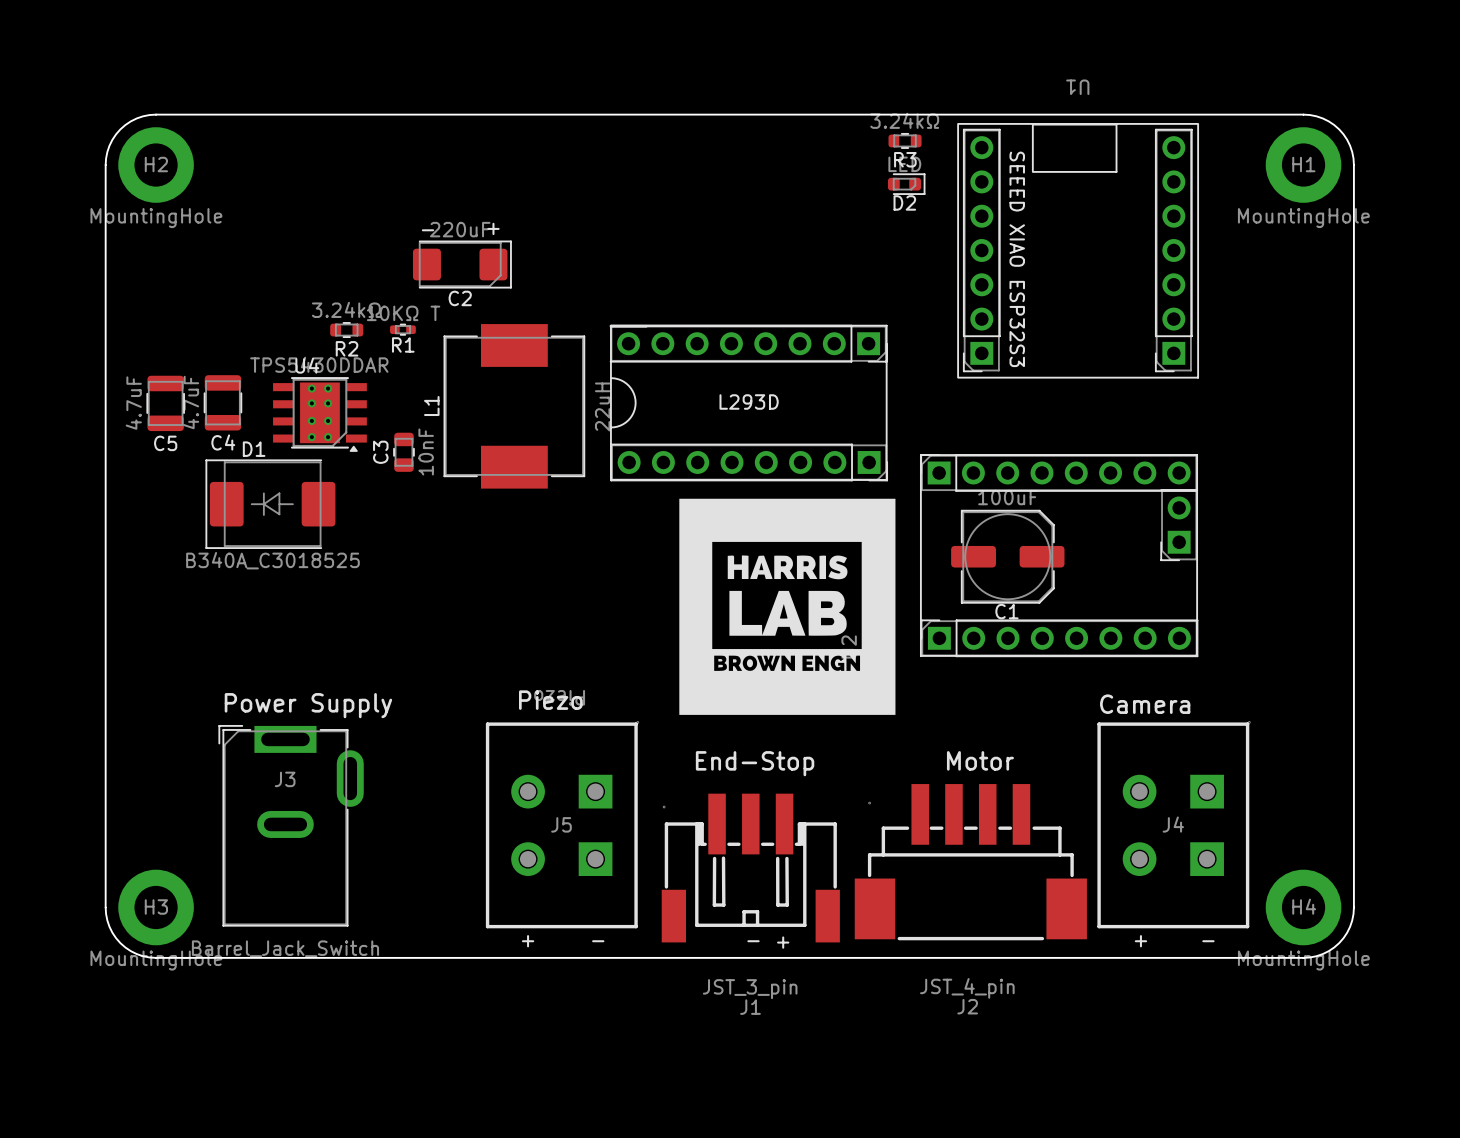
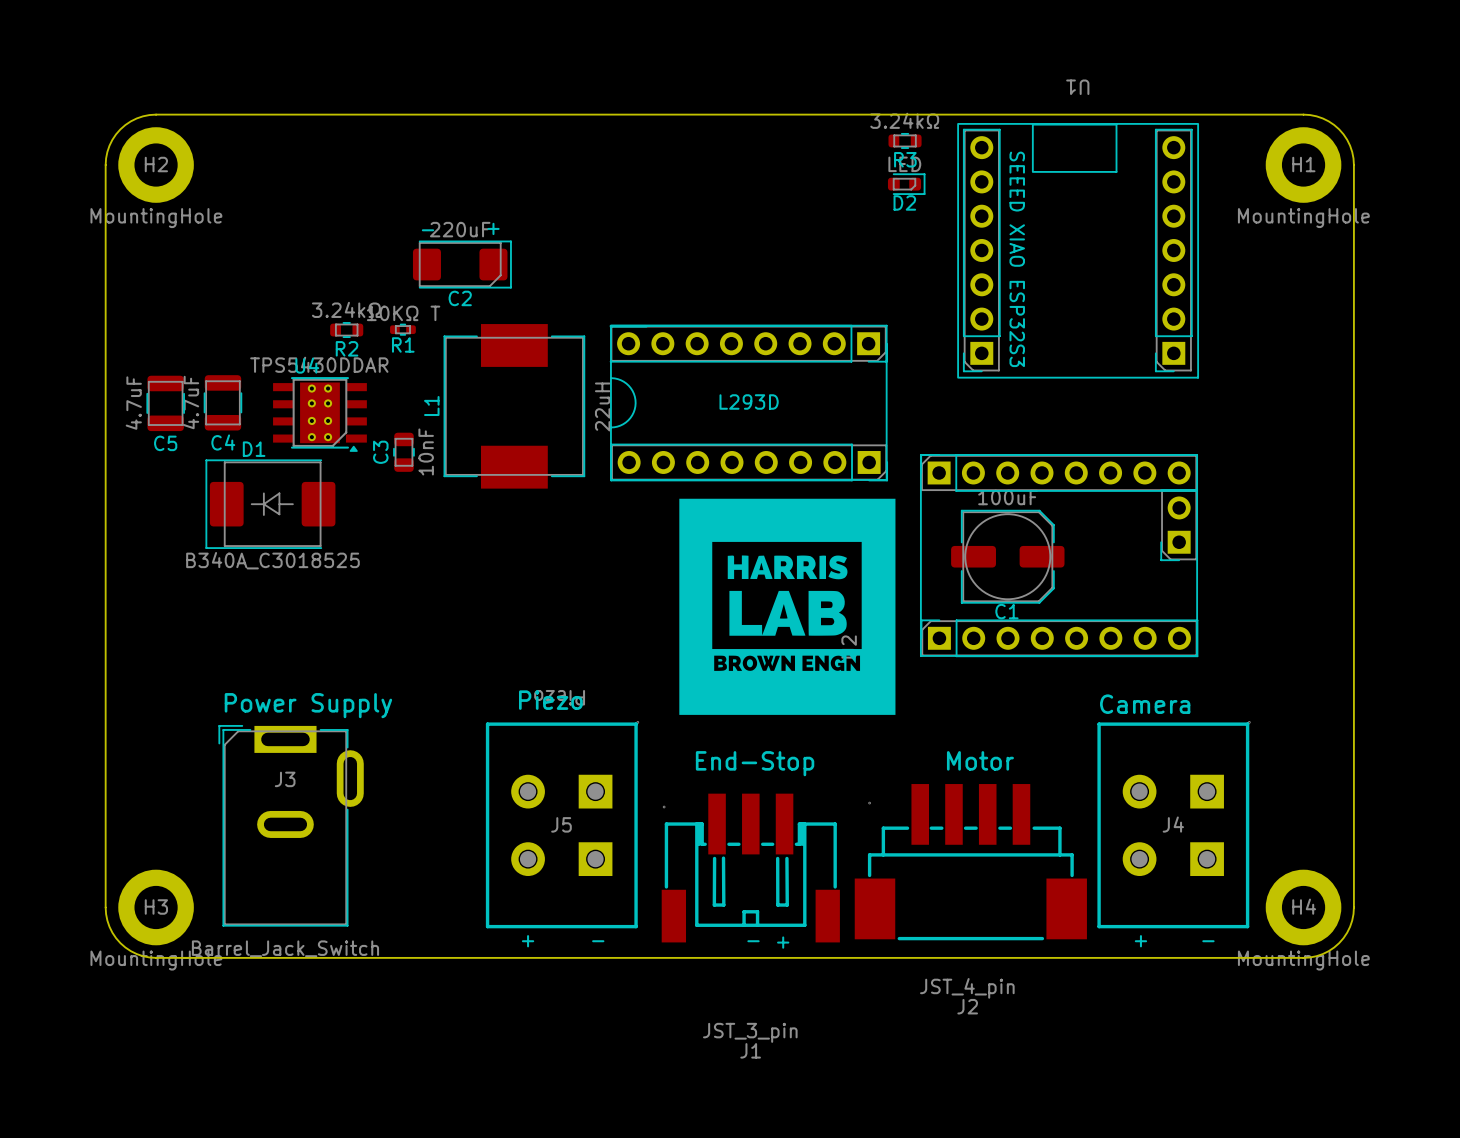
J1 value position: JST_3_pin (750, 989) -> JST_3_pin (750, 1032)
J1 name position: J1 (750, 1007) -> J1 (750, 1050)

